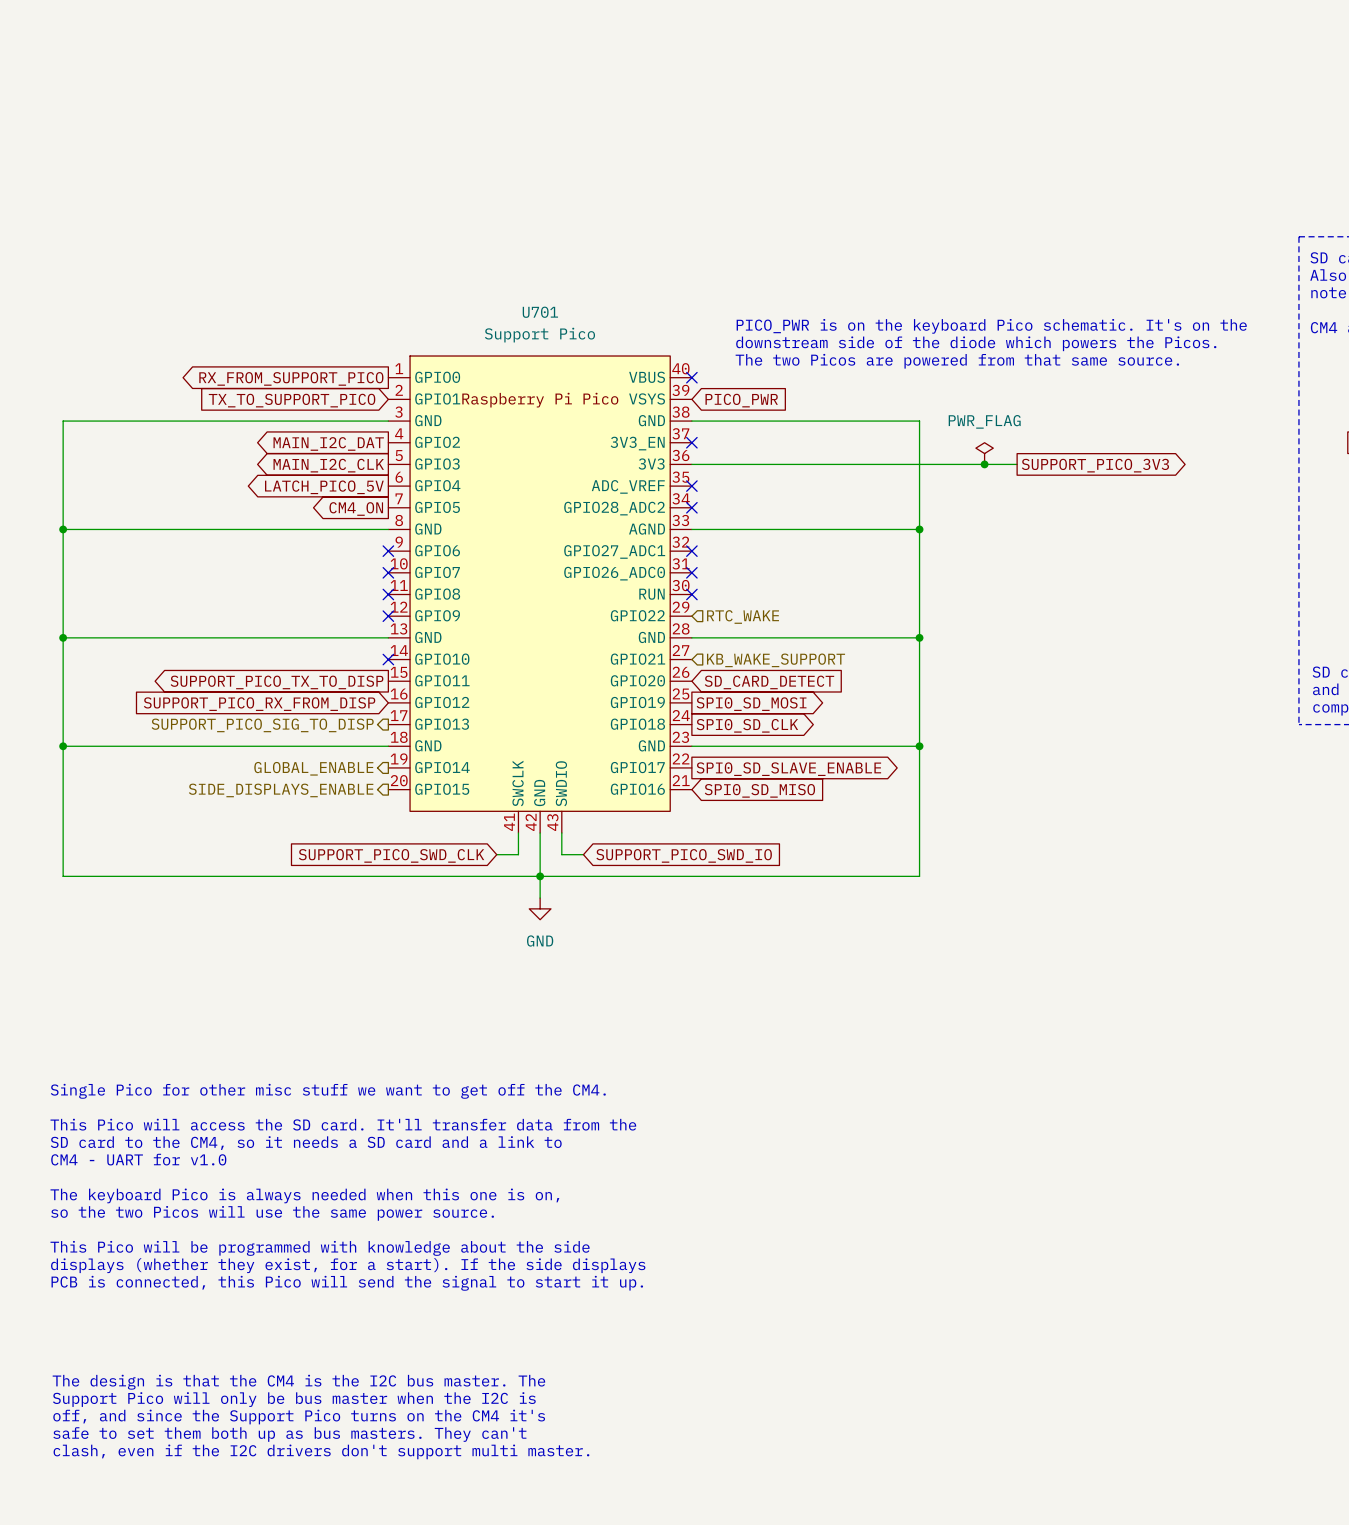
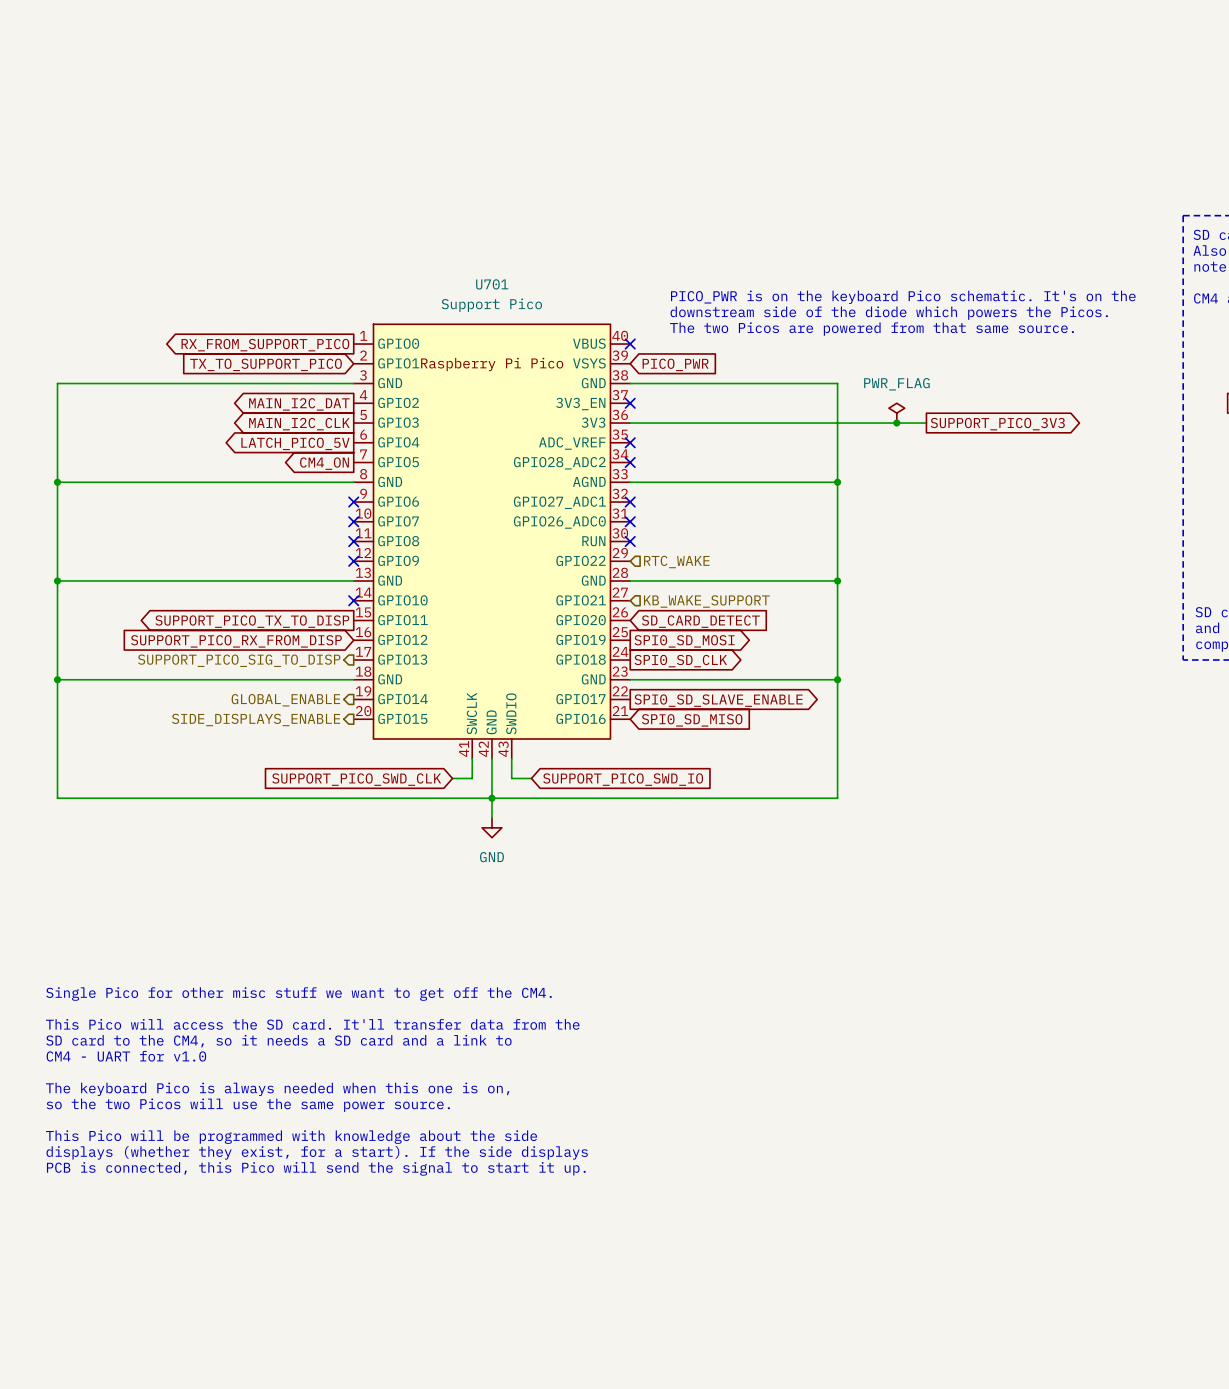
text: The design is that the CM4 is the I2C bus master. The (298, 1382) -> none
text: Support Pico will only be bus master when the I2C is (294, 1399) -> none
text: off, and since the Support Pico turns on the CM4 it's (299, 1417) -> none
text: safe to set them both up as bus masters. They can't (289, 1434) -> none
text: clash, even if the I2C drivers don't support multi master. (321, 1451) -> none

